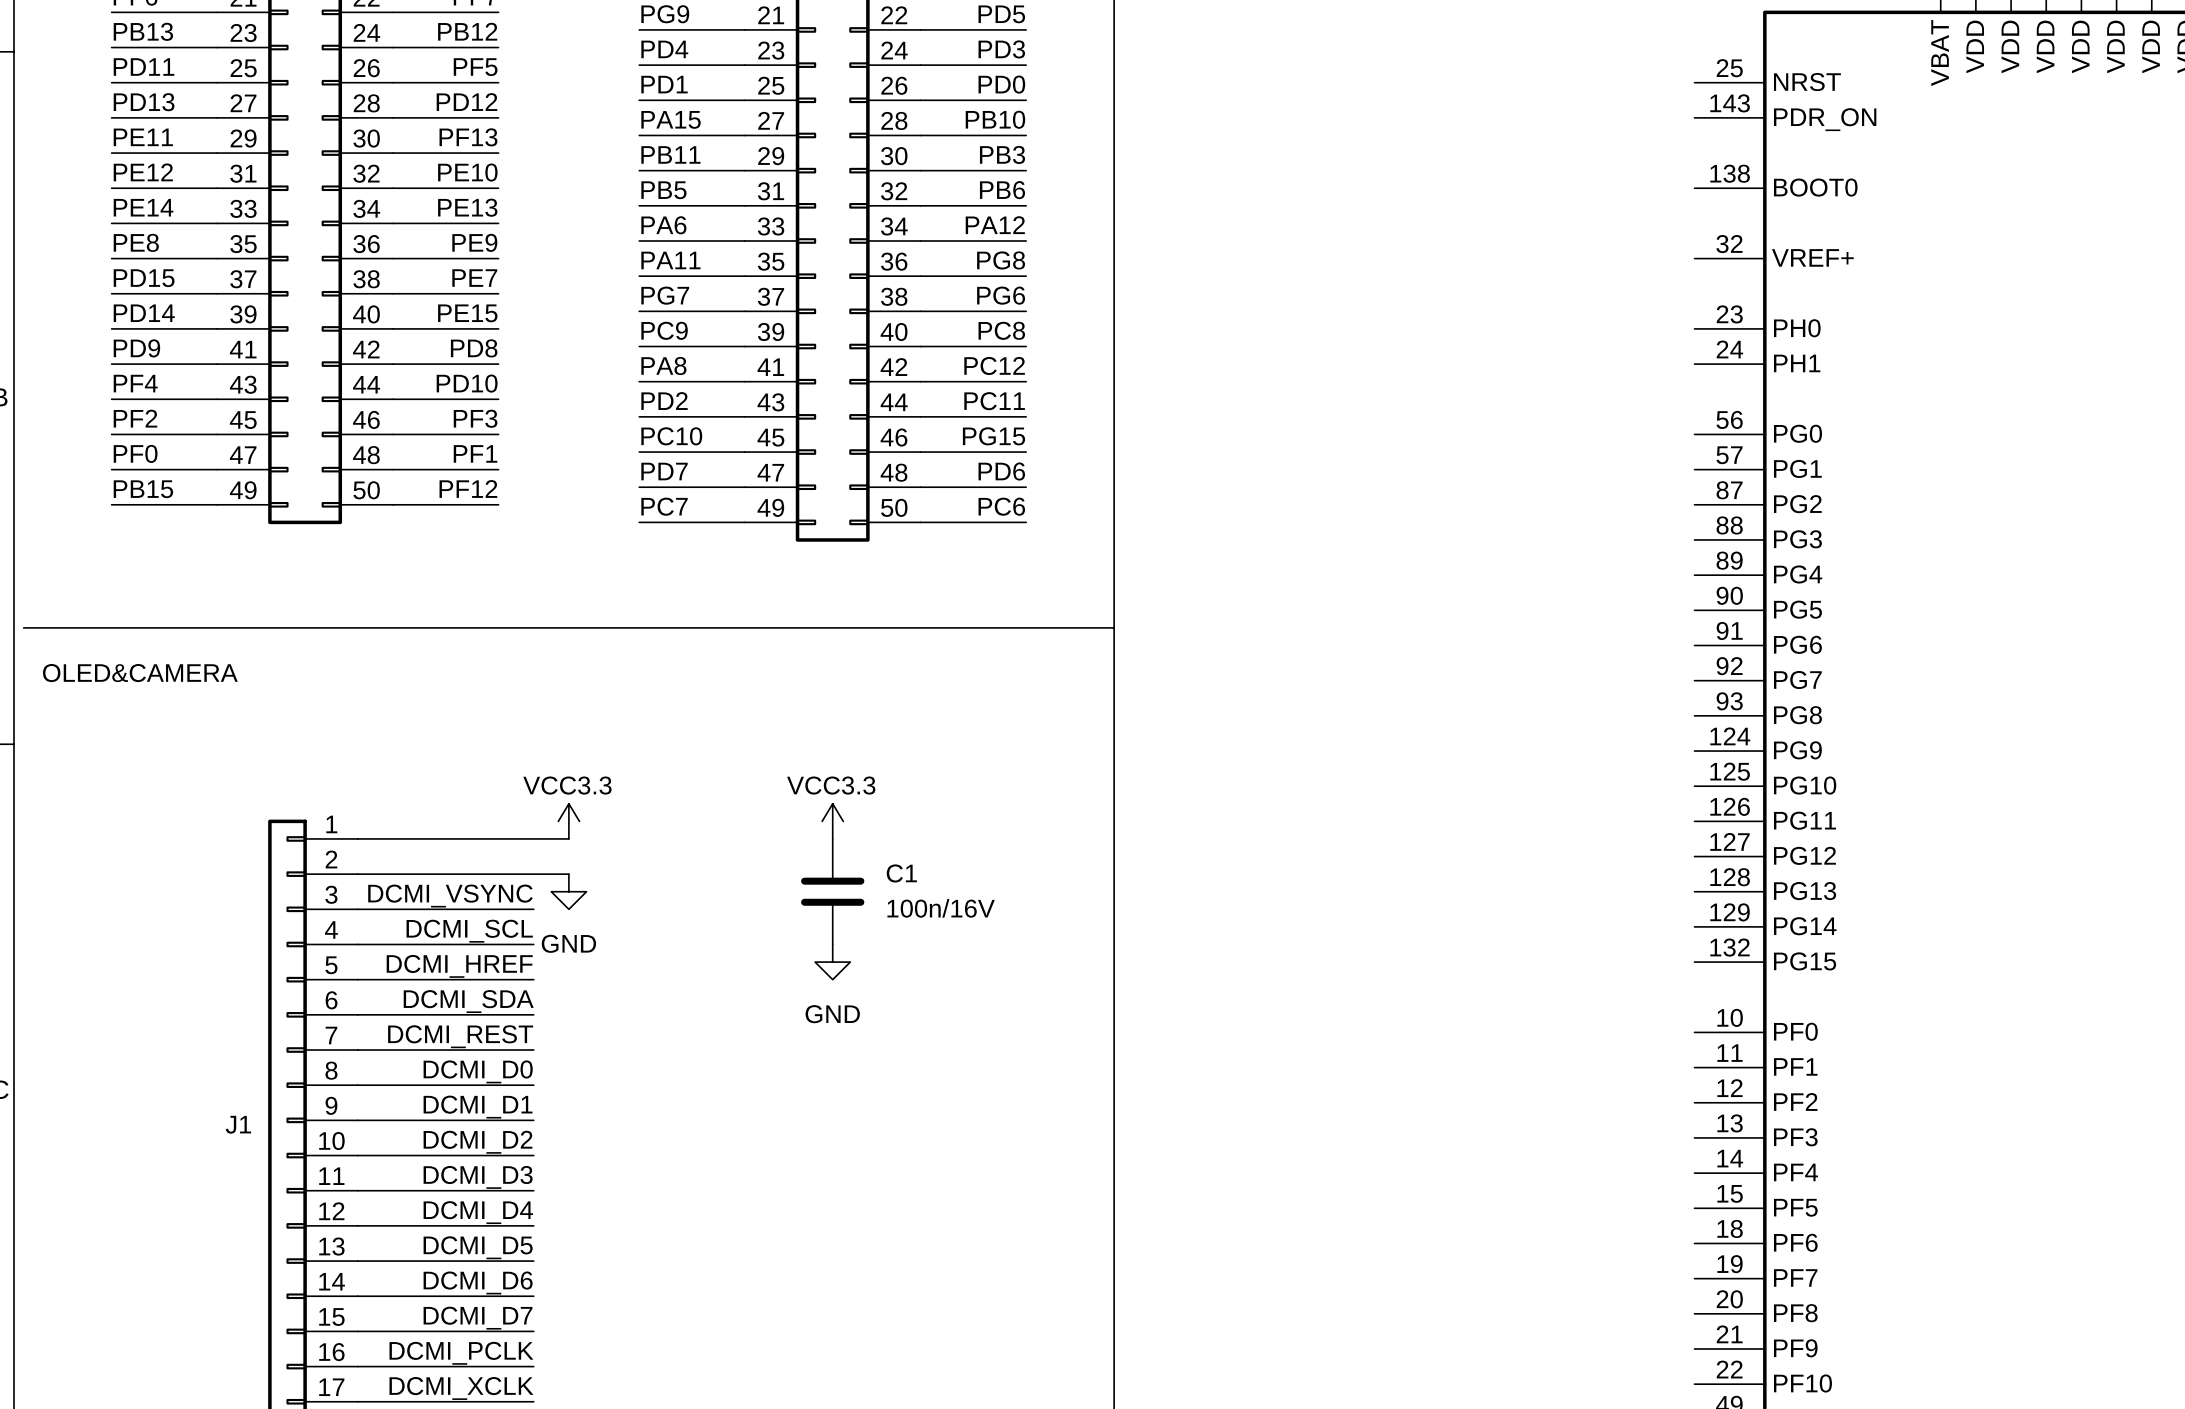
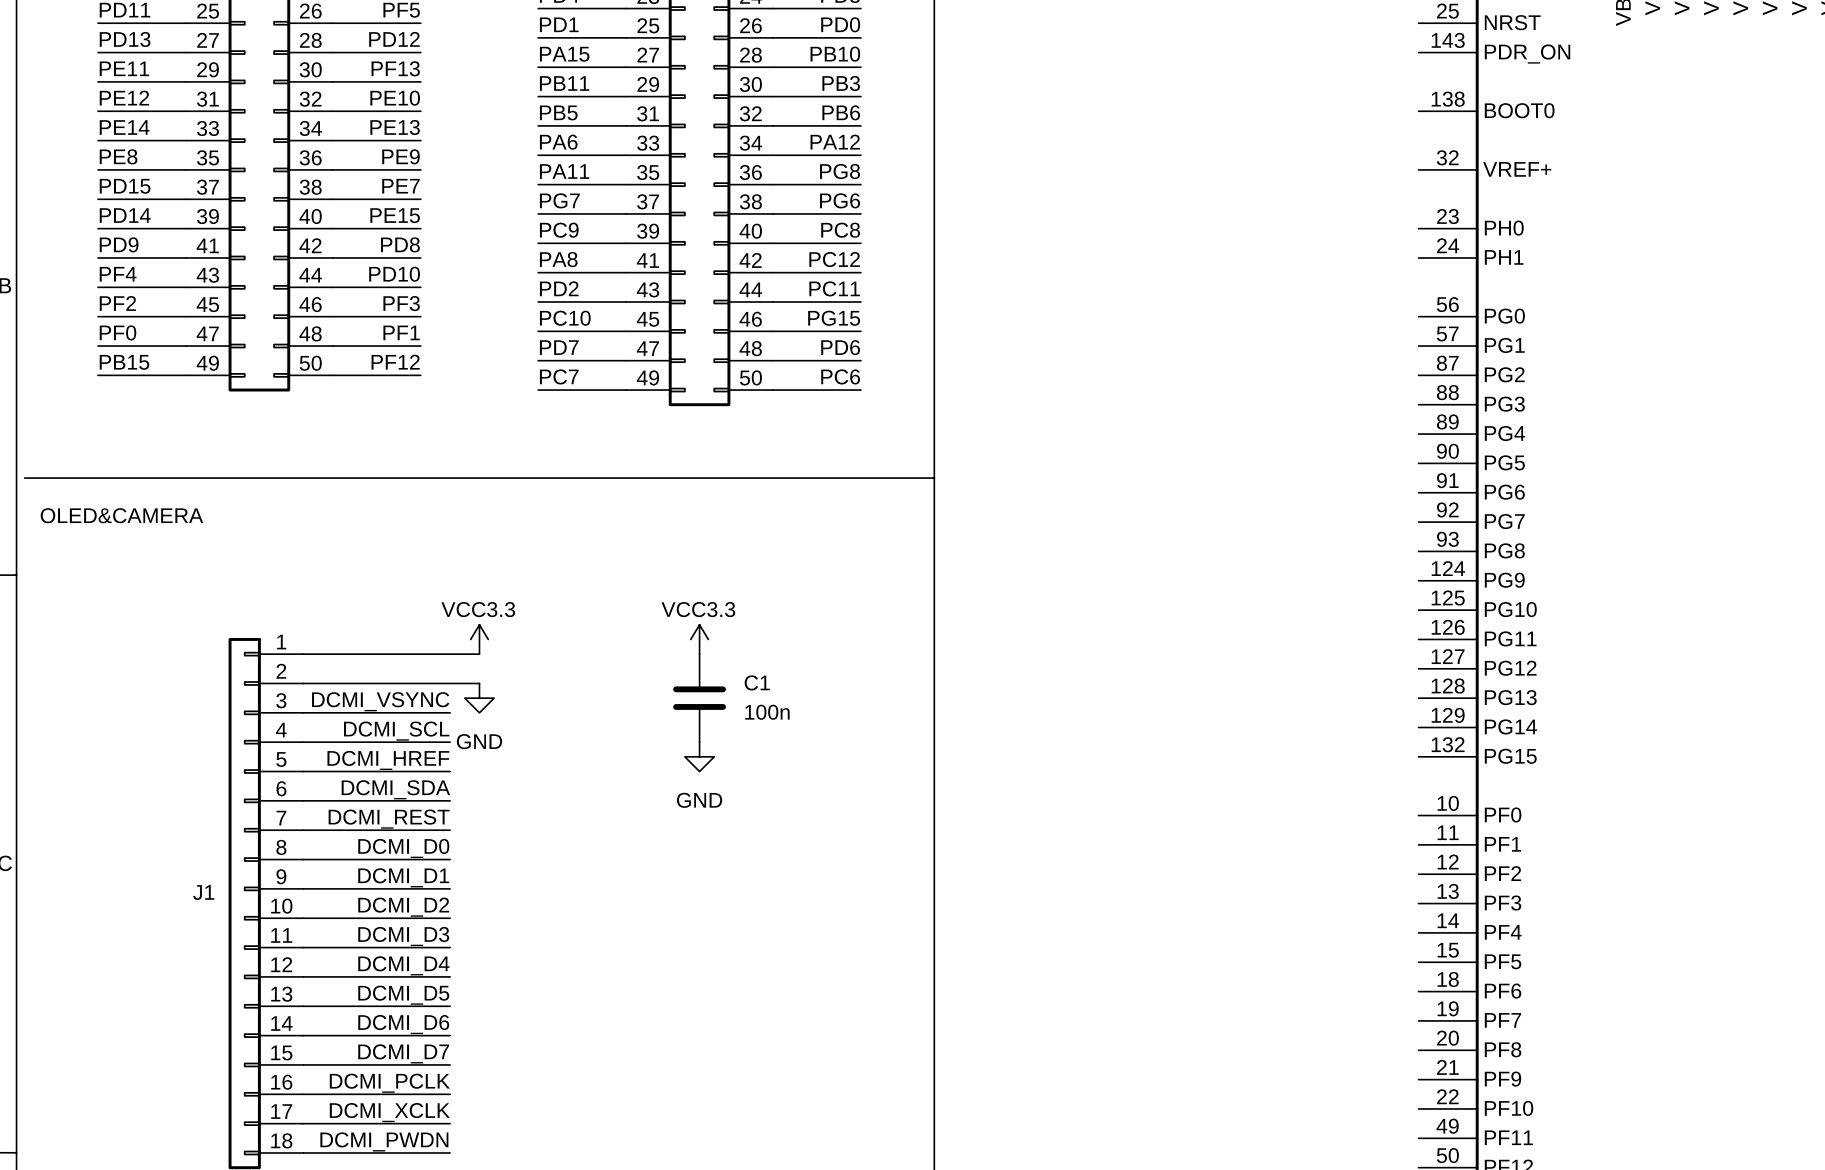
C1 value: 100n/16V (941, 908) -> 100n (767, 712)

